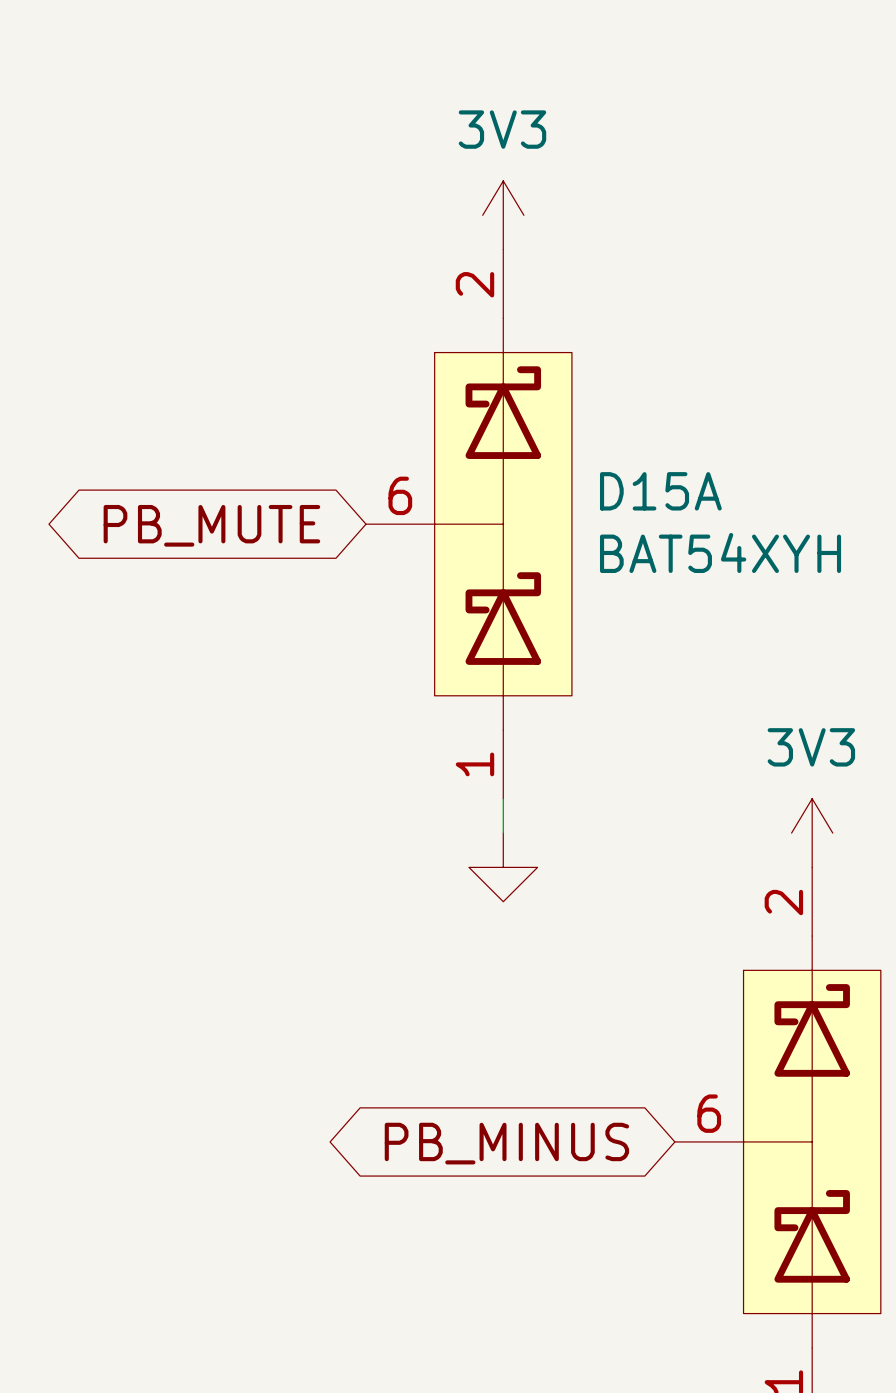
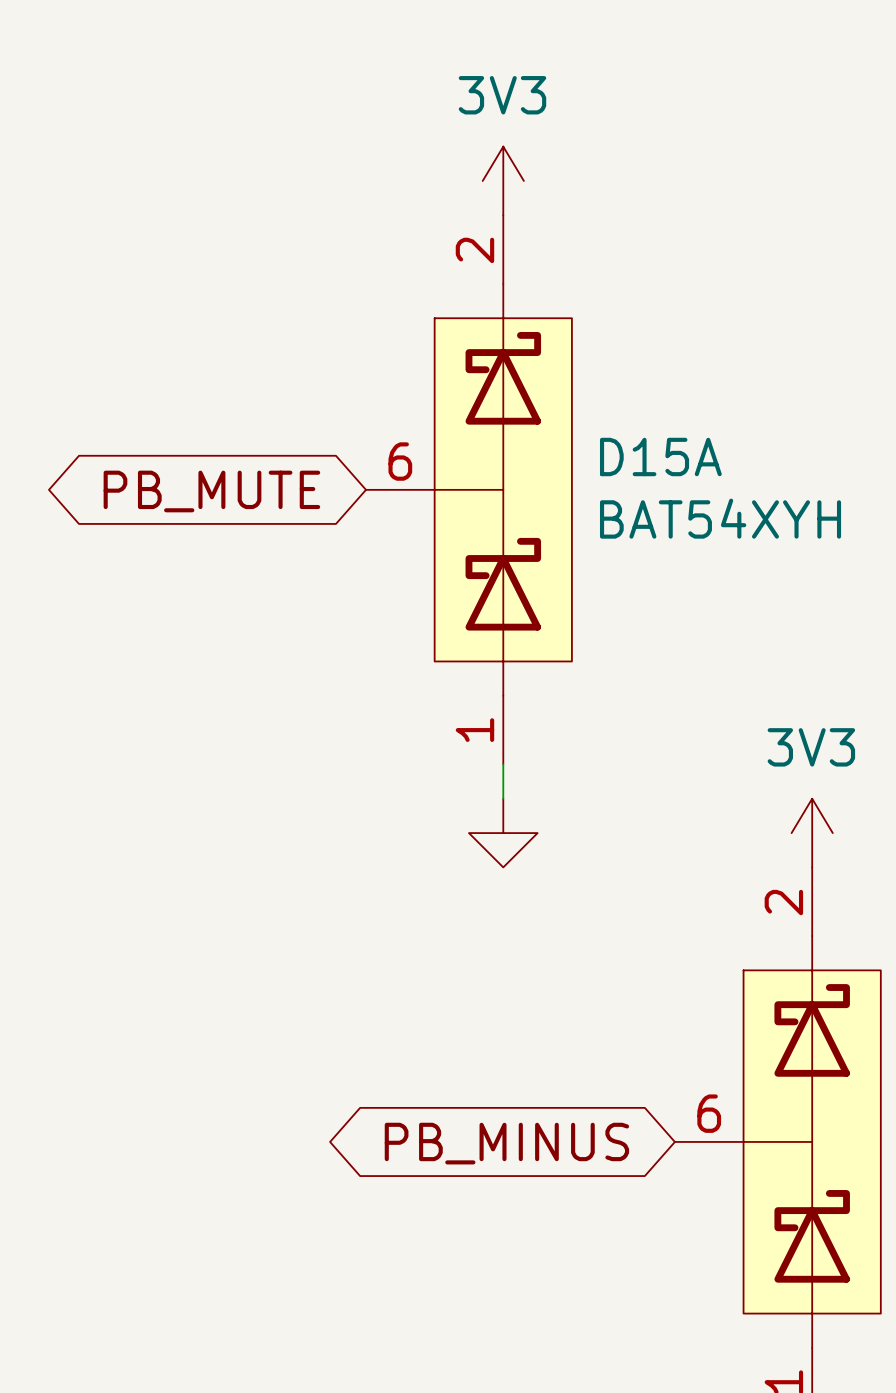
power symbol position: 3V3 (503, 215) -> 3V3 (503, 180)
D15A position: (468, 524) -> (468, 489)
global label position: PB_MUTE (211, 525) -> PB_MUTE (211, 491)
power symbol position: (503, 867) -> (503, 833)

